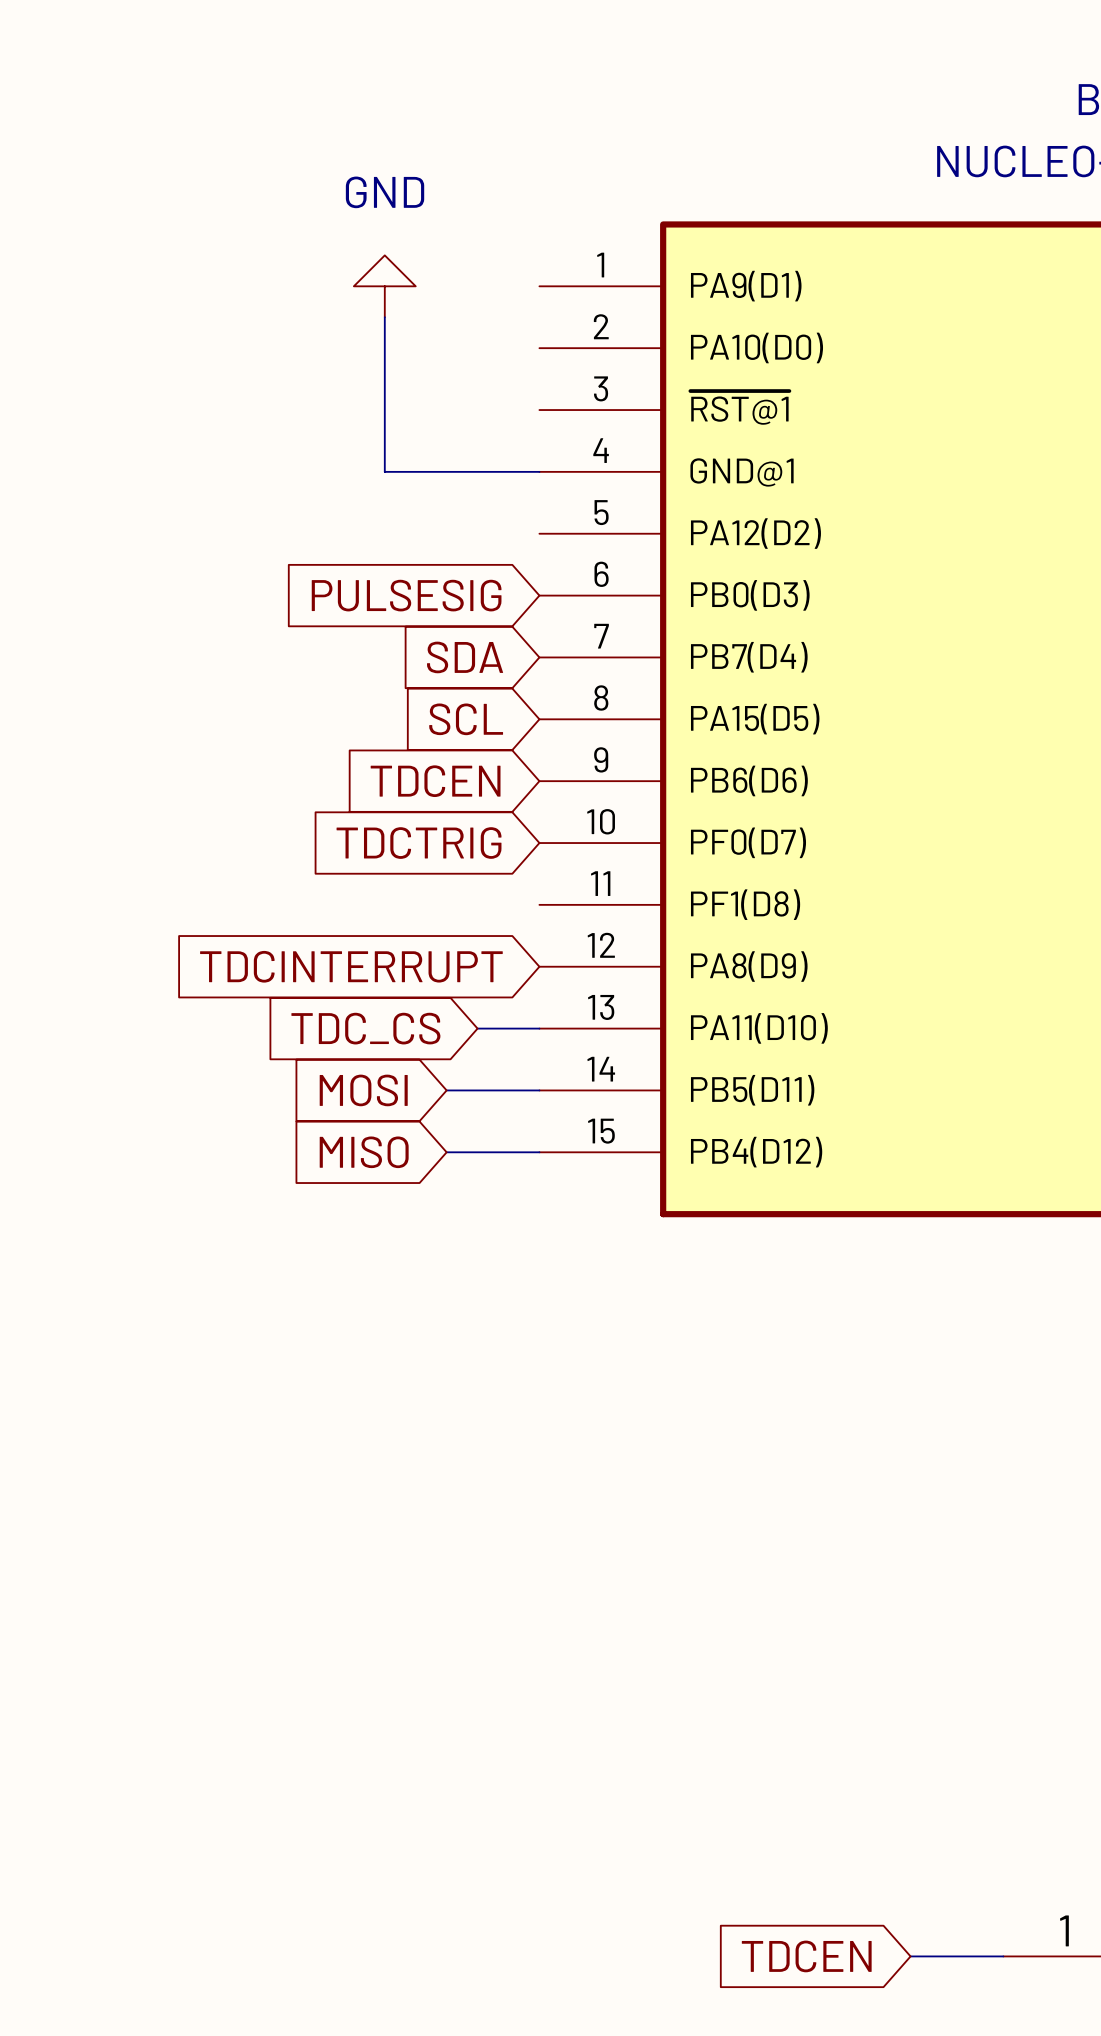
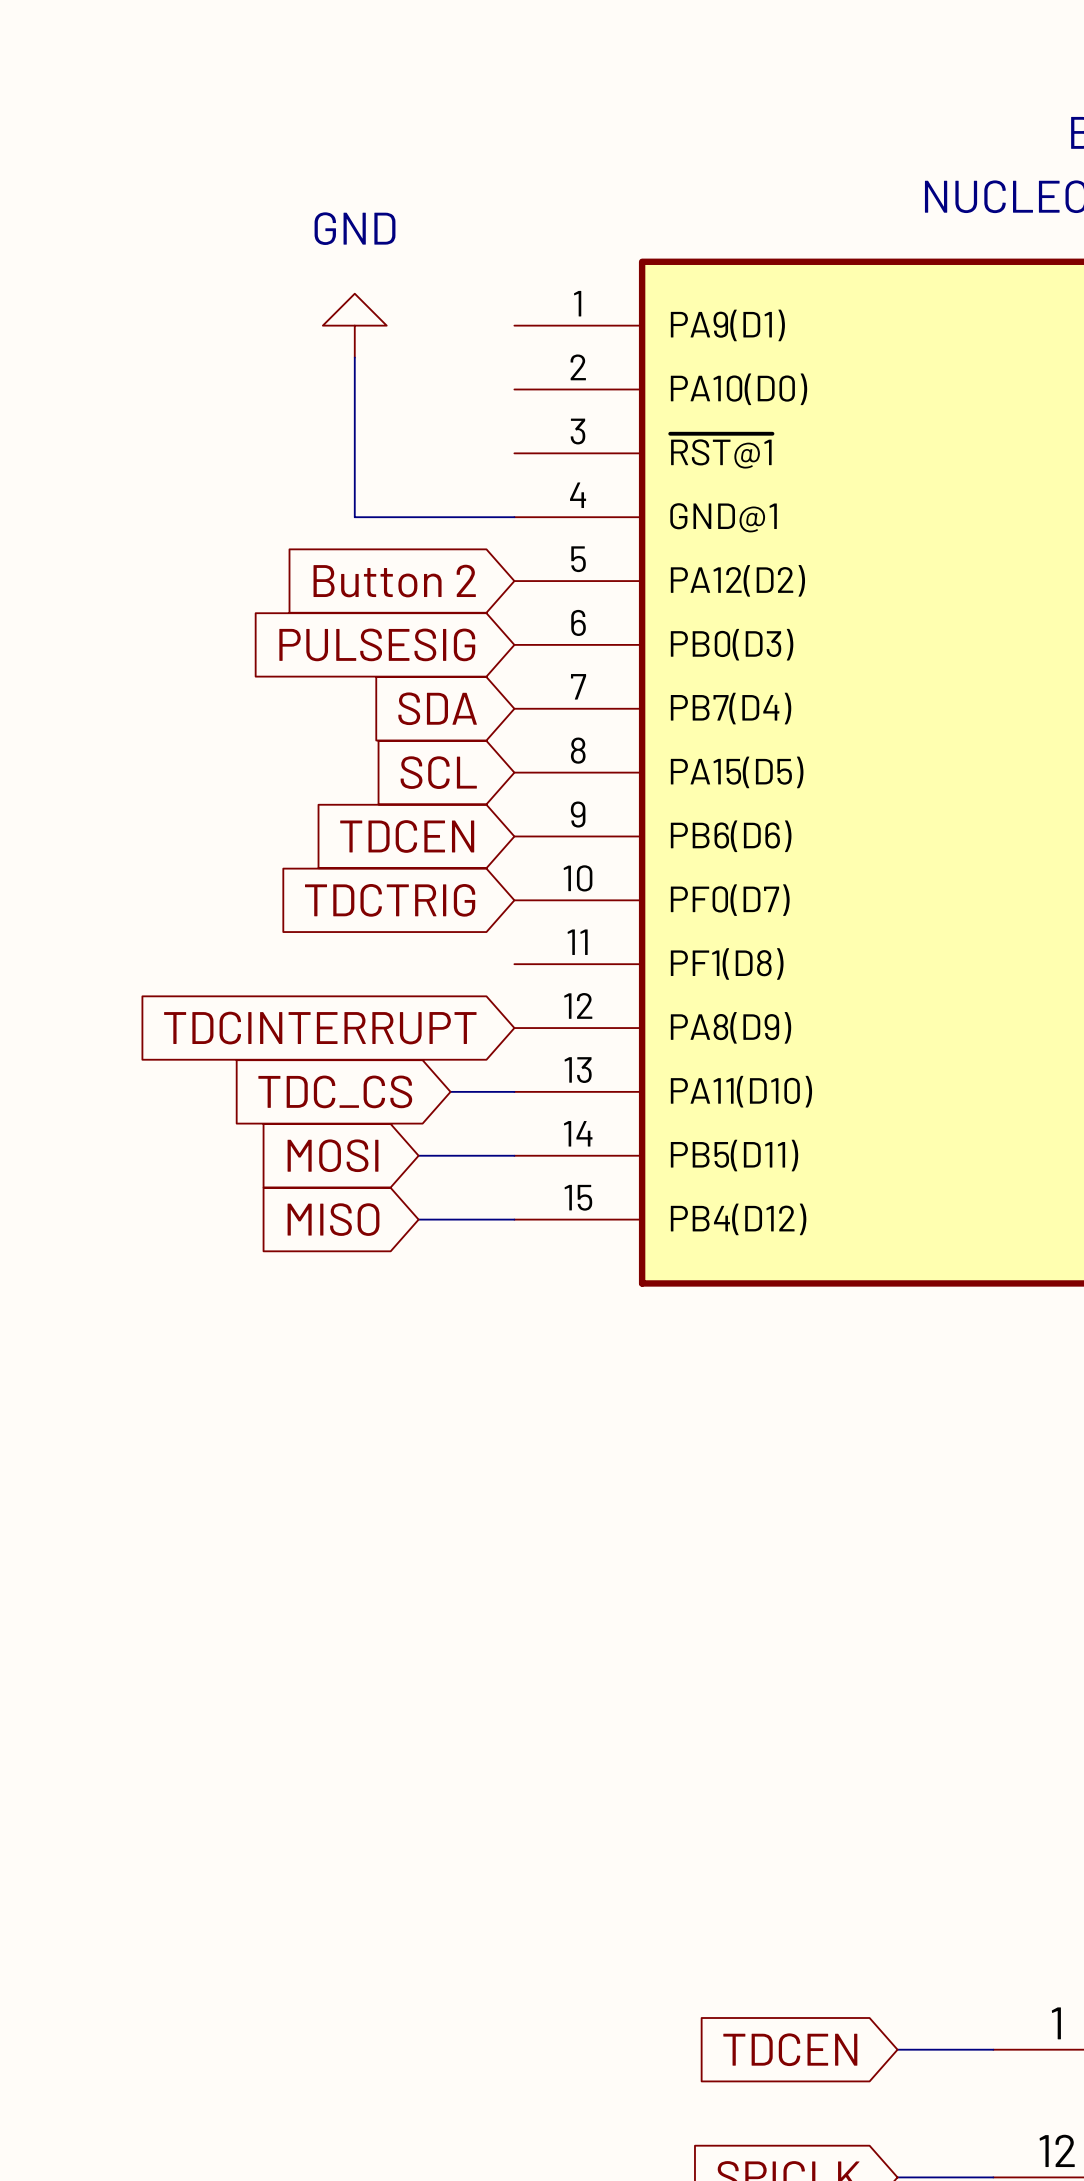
global label: none -> Button 2 (394, 581)

